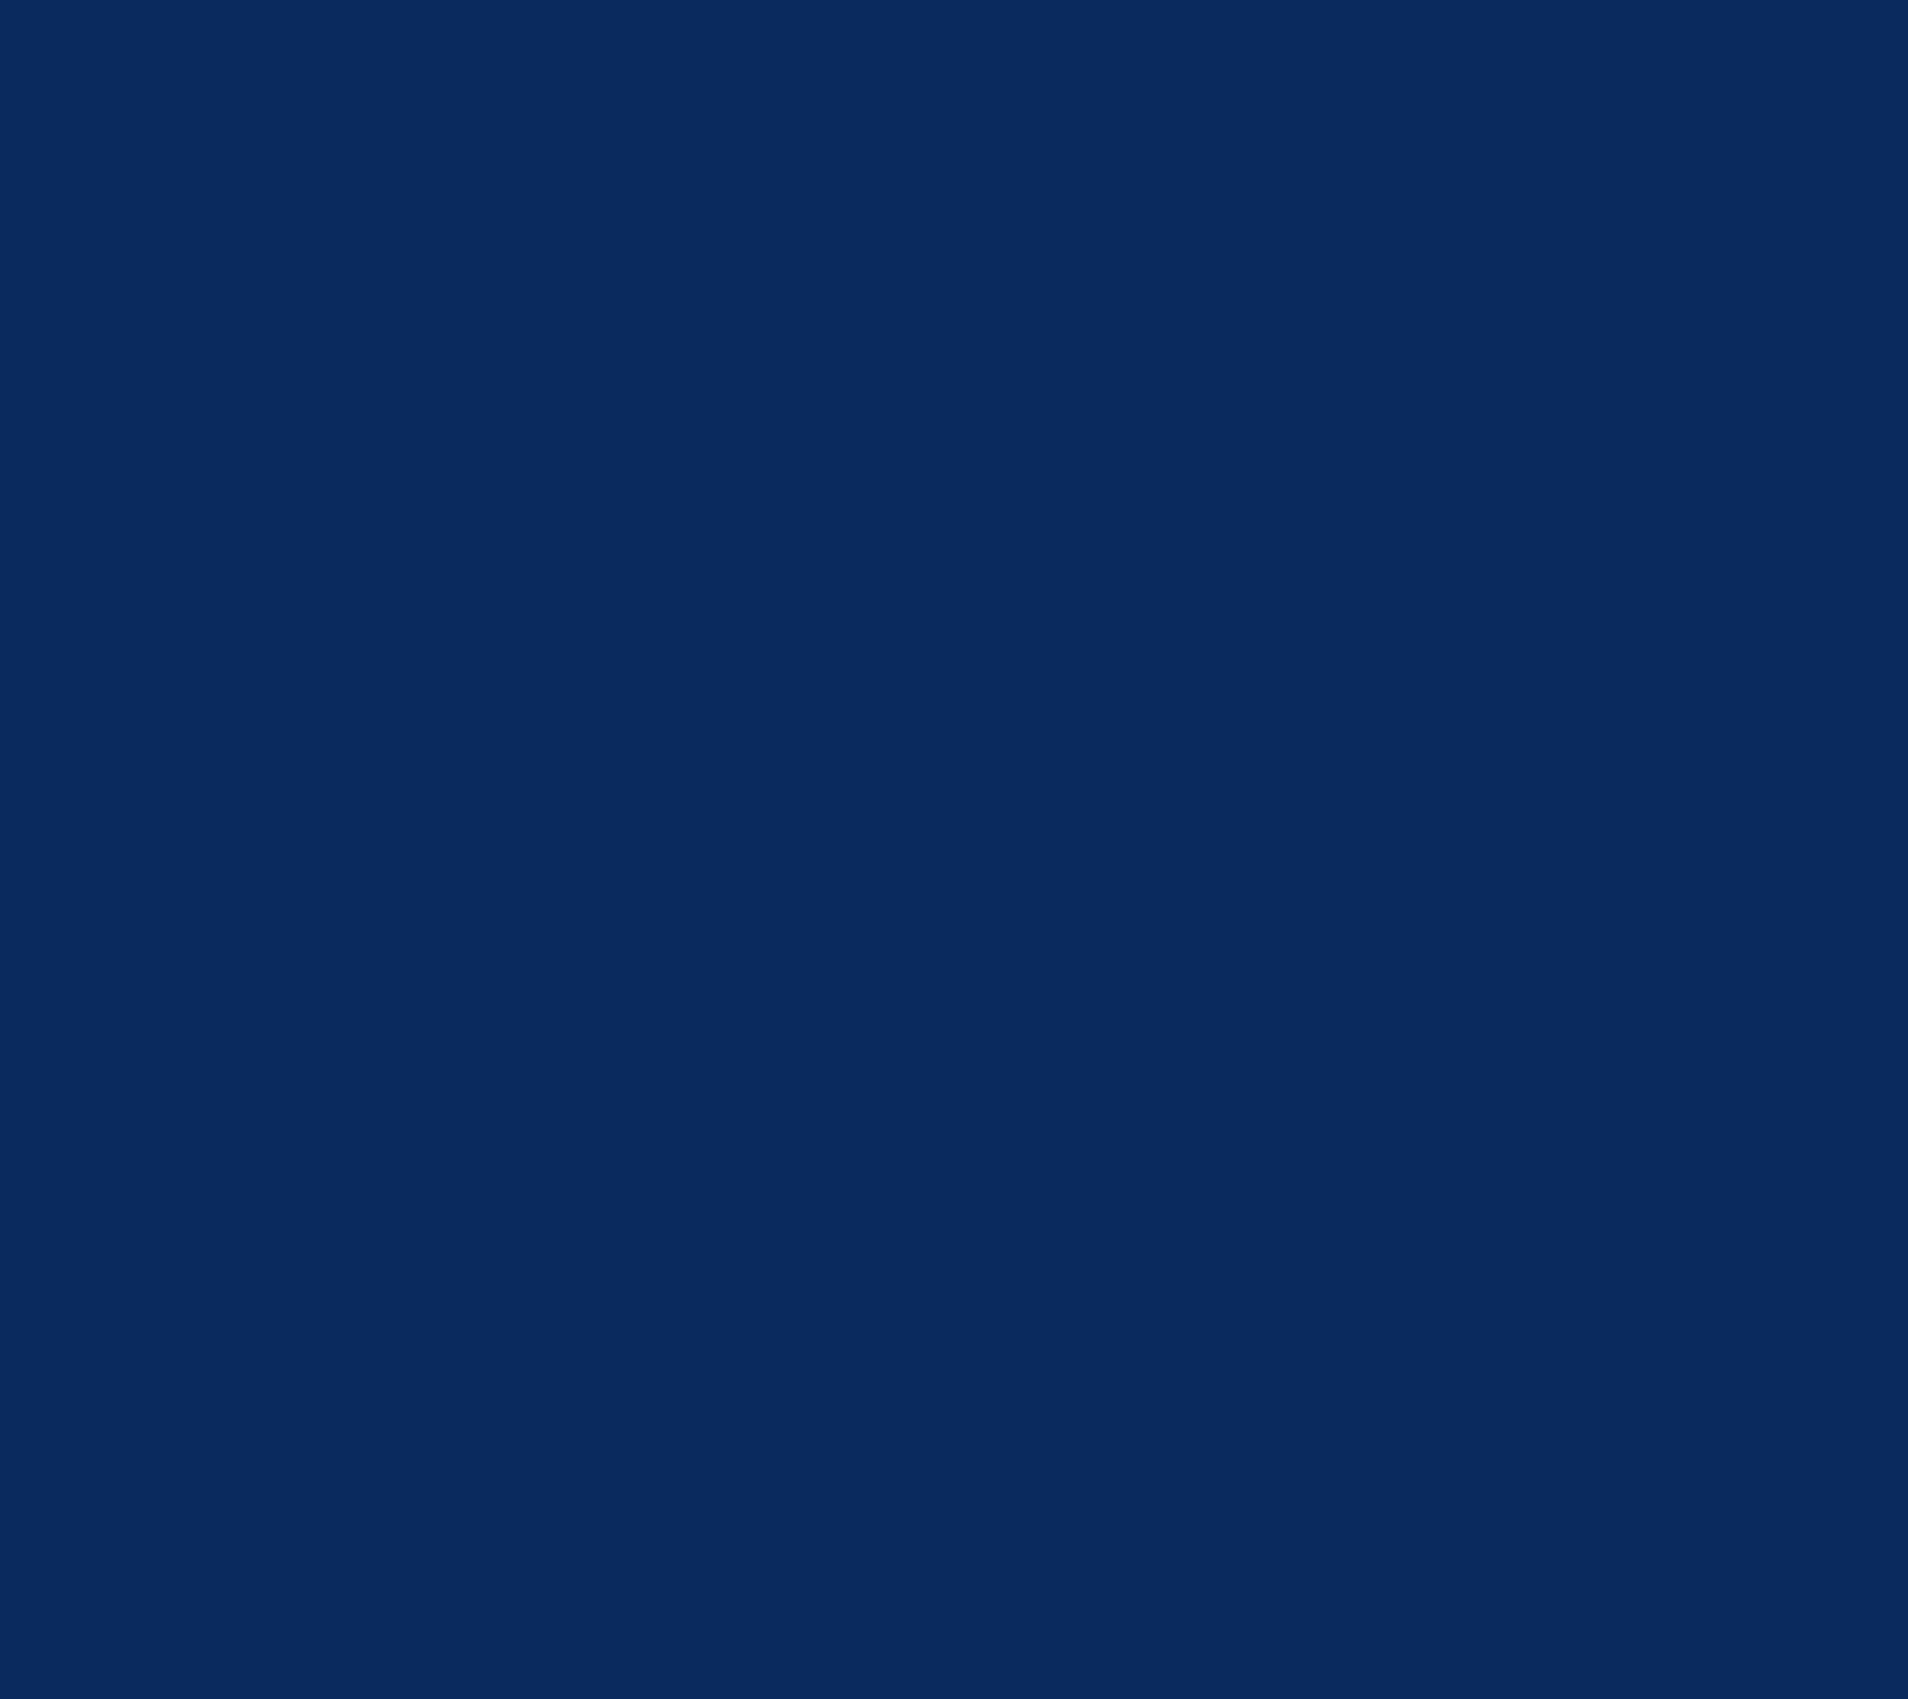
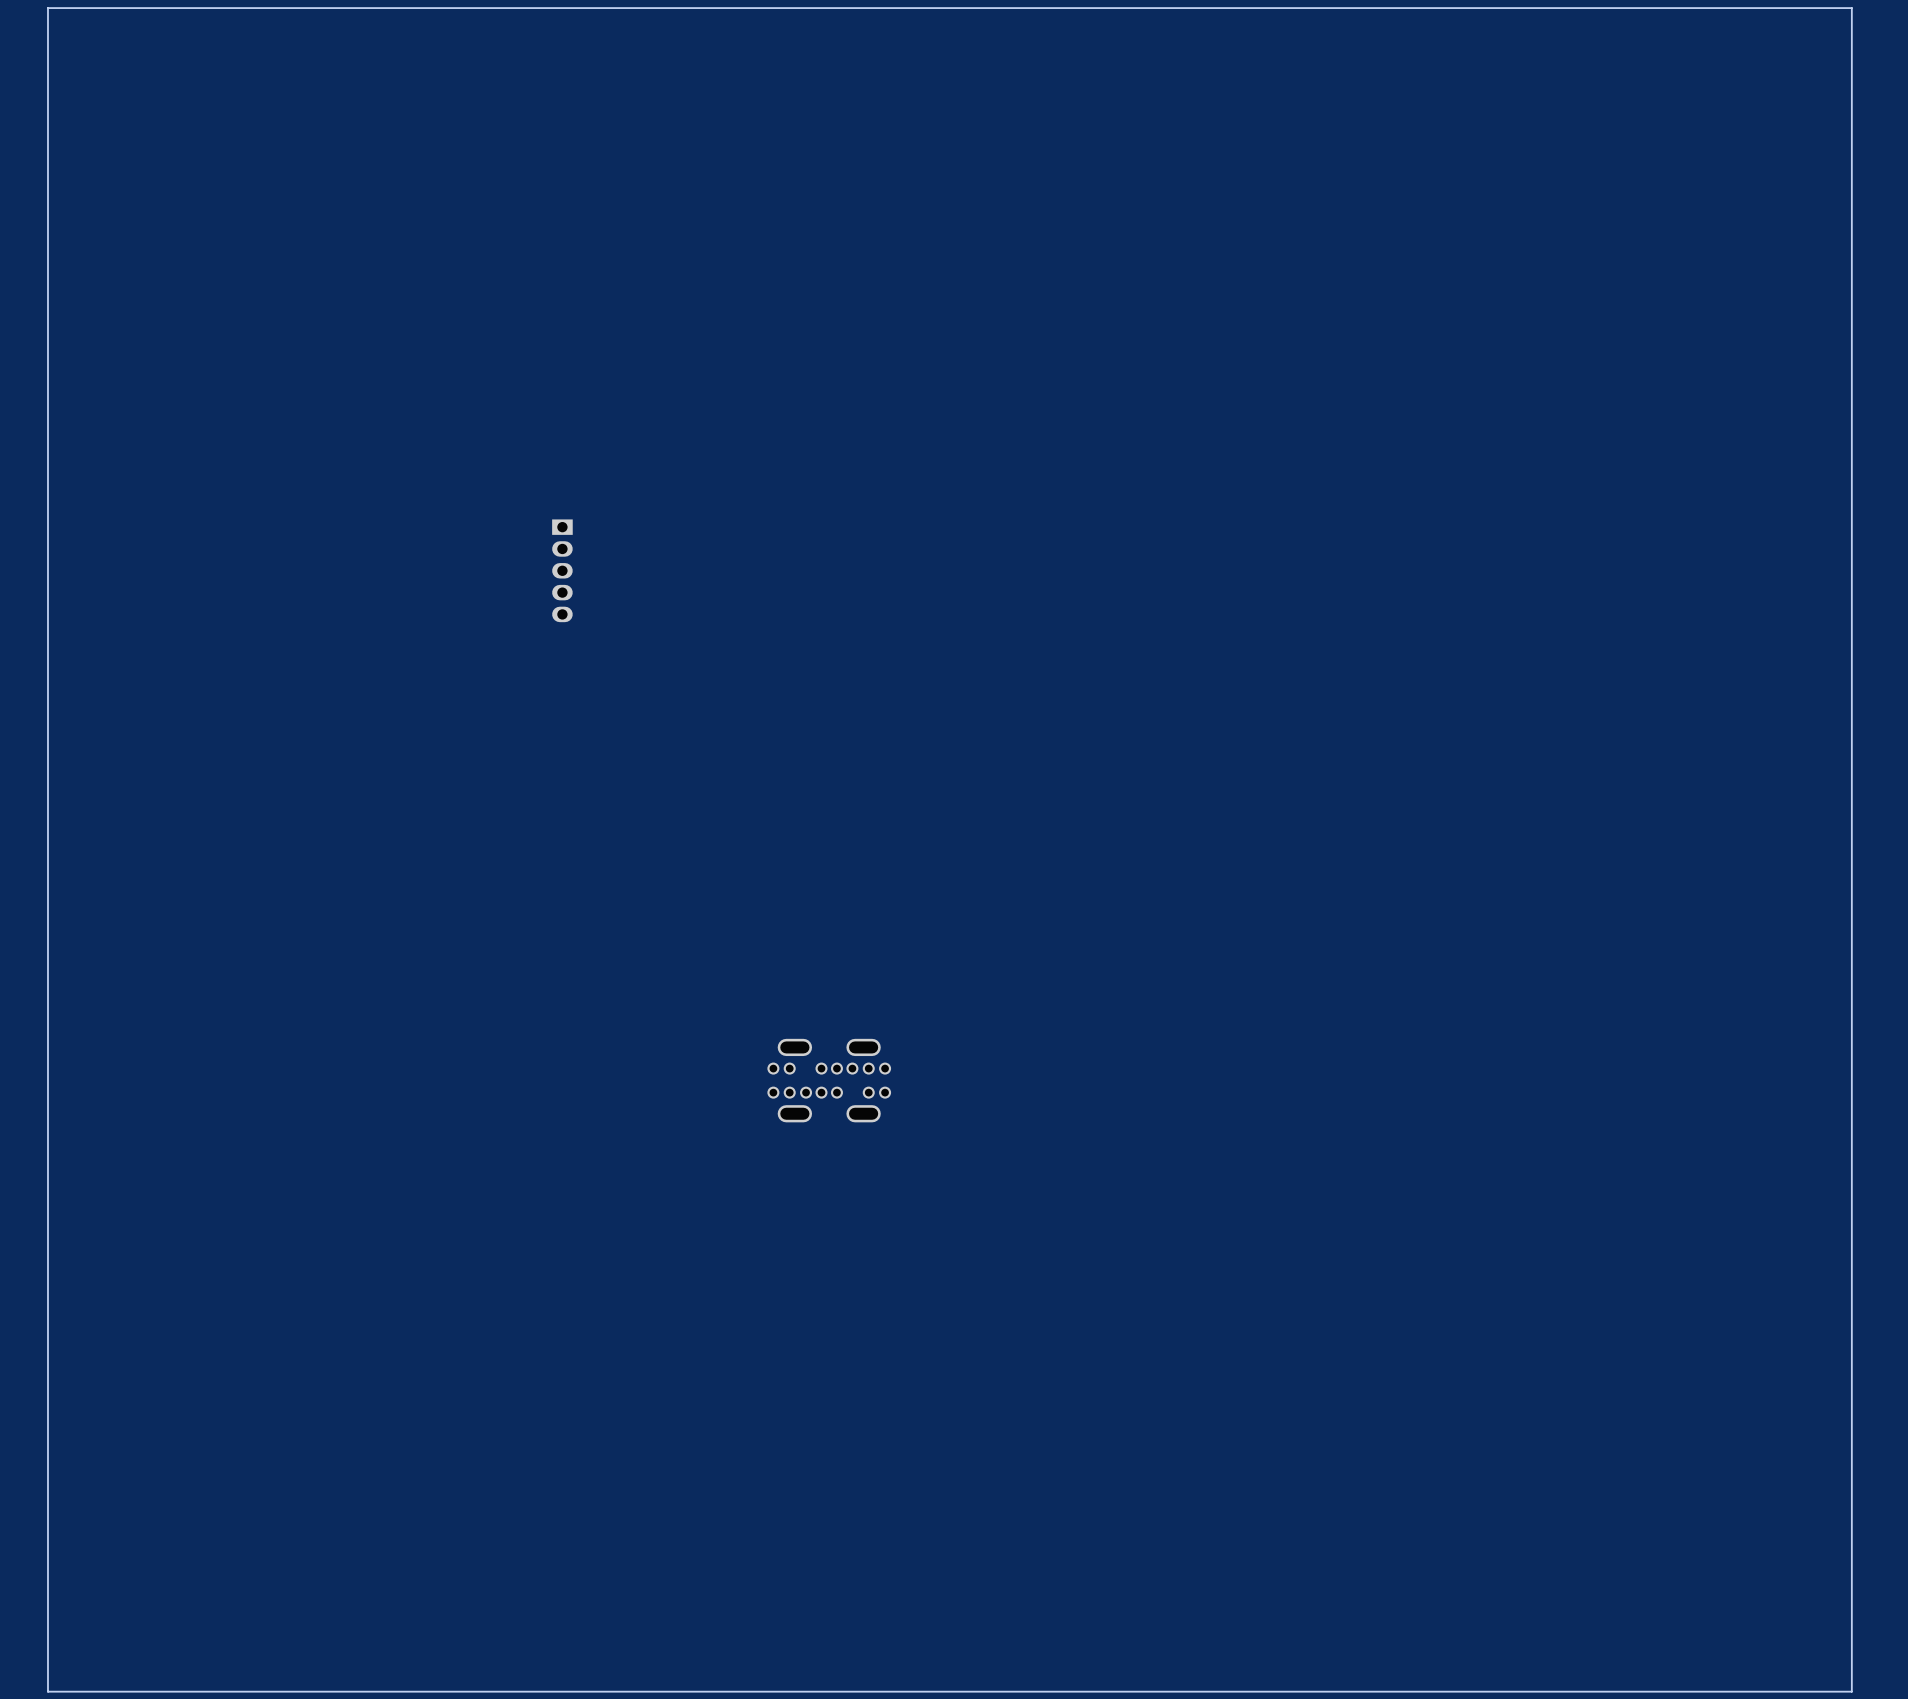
board edge: none -> (1851, 8) (47, 8) (47, 1691) (1851, 1691) (1851, 8)
part: none -> (562, 570)
part: none -> (829, 1080)

